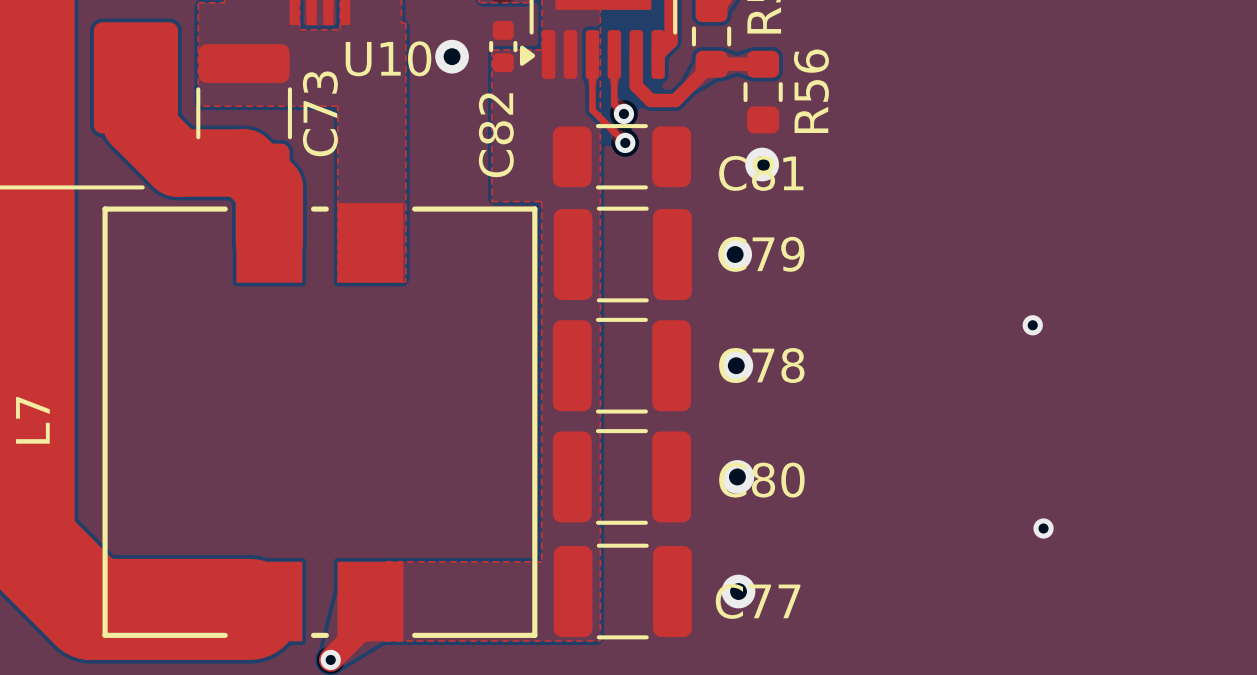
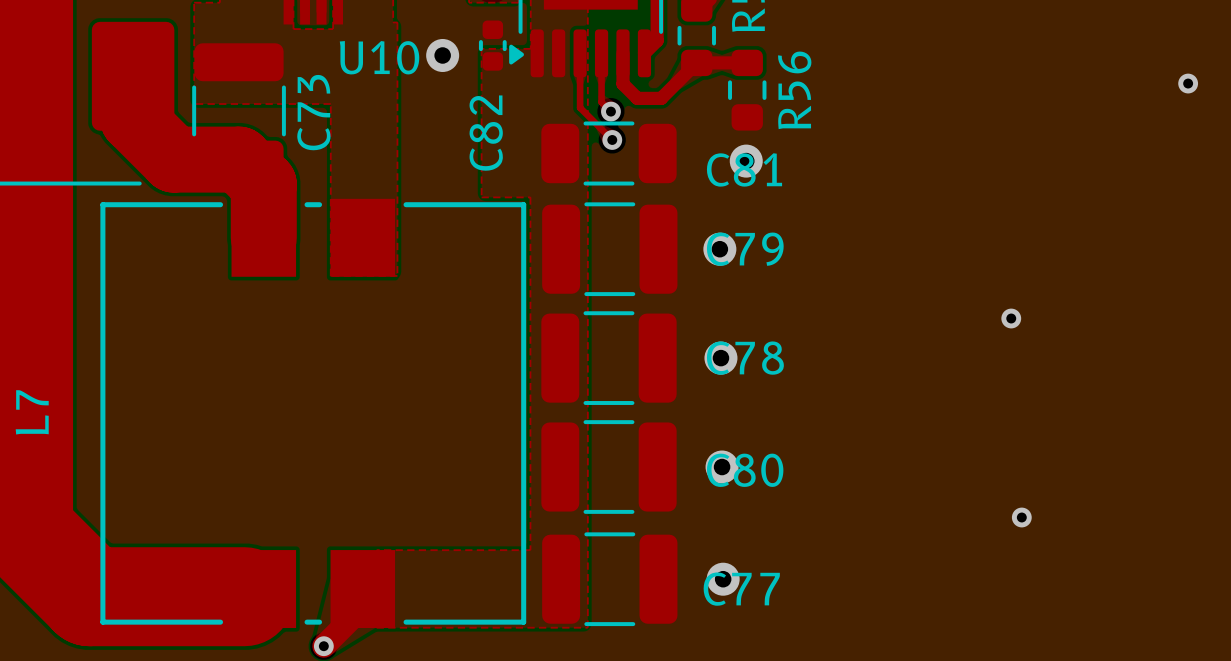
via: none -> (1188, 83)

